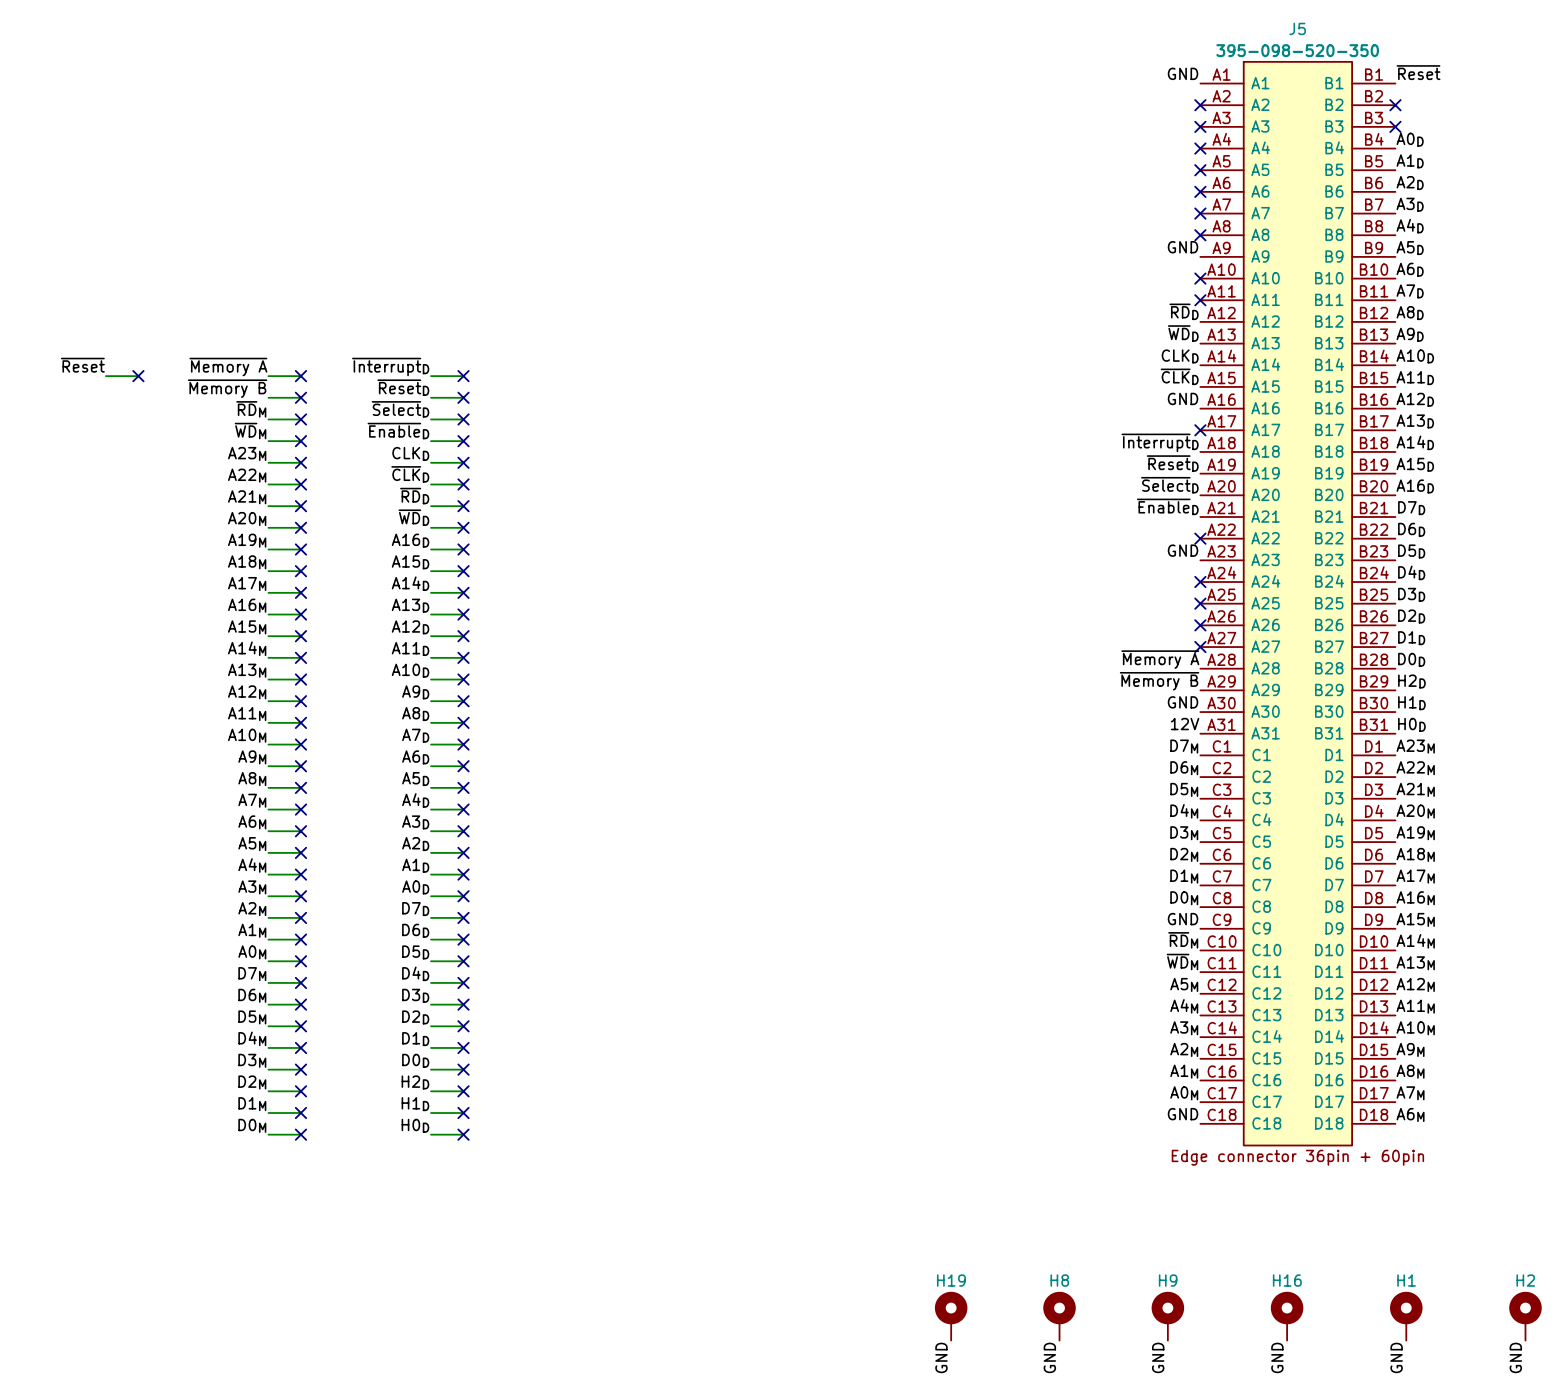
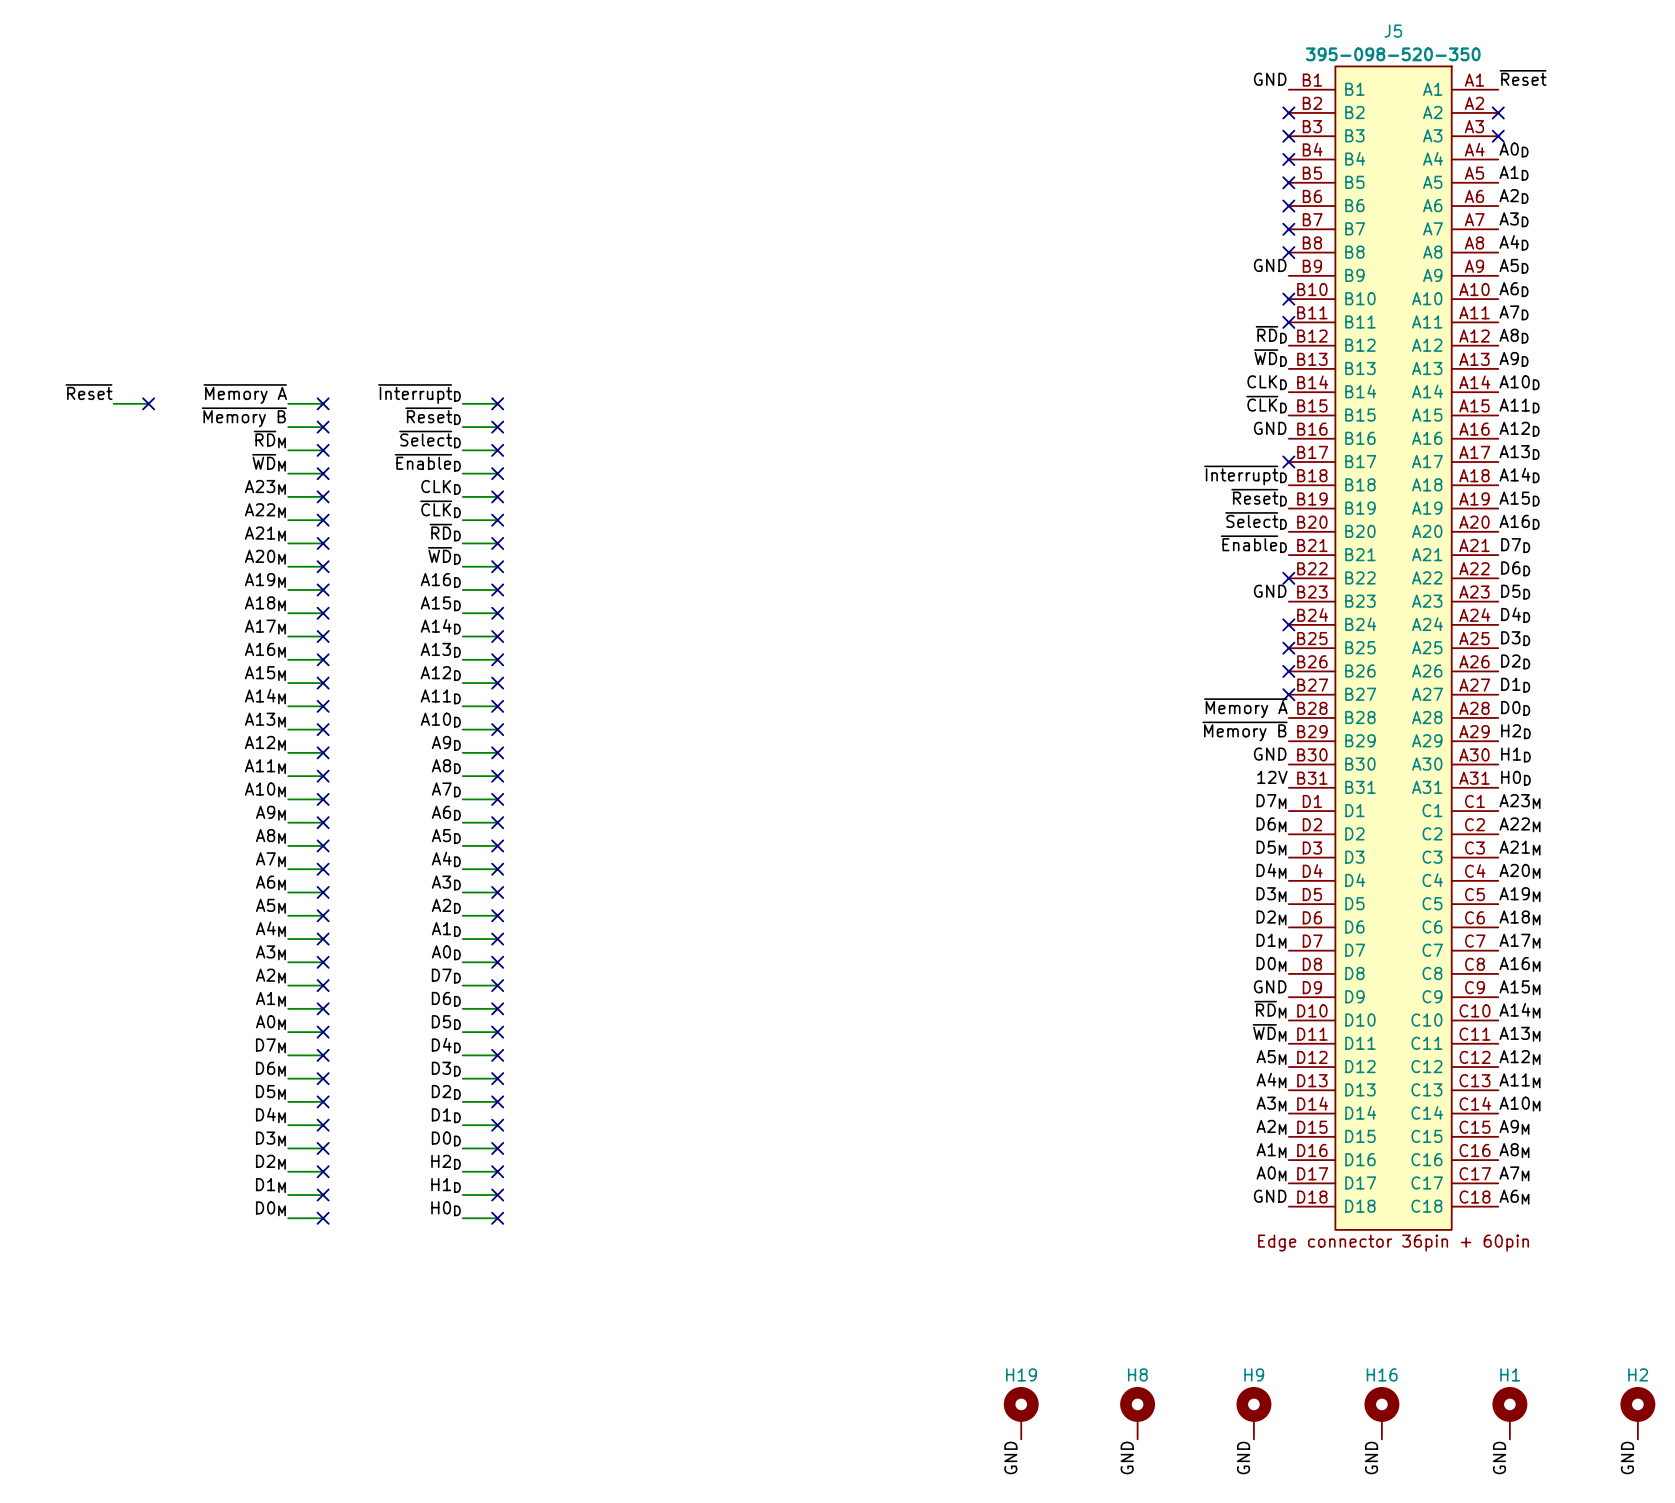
J5 flip: as is (1297, 603) -> left-right (1393, 648)

